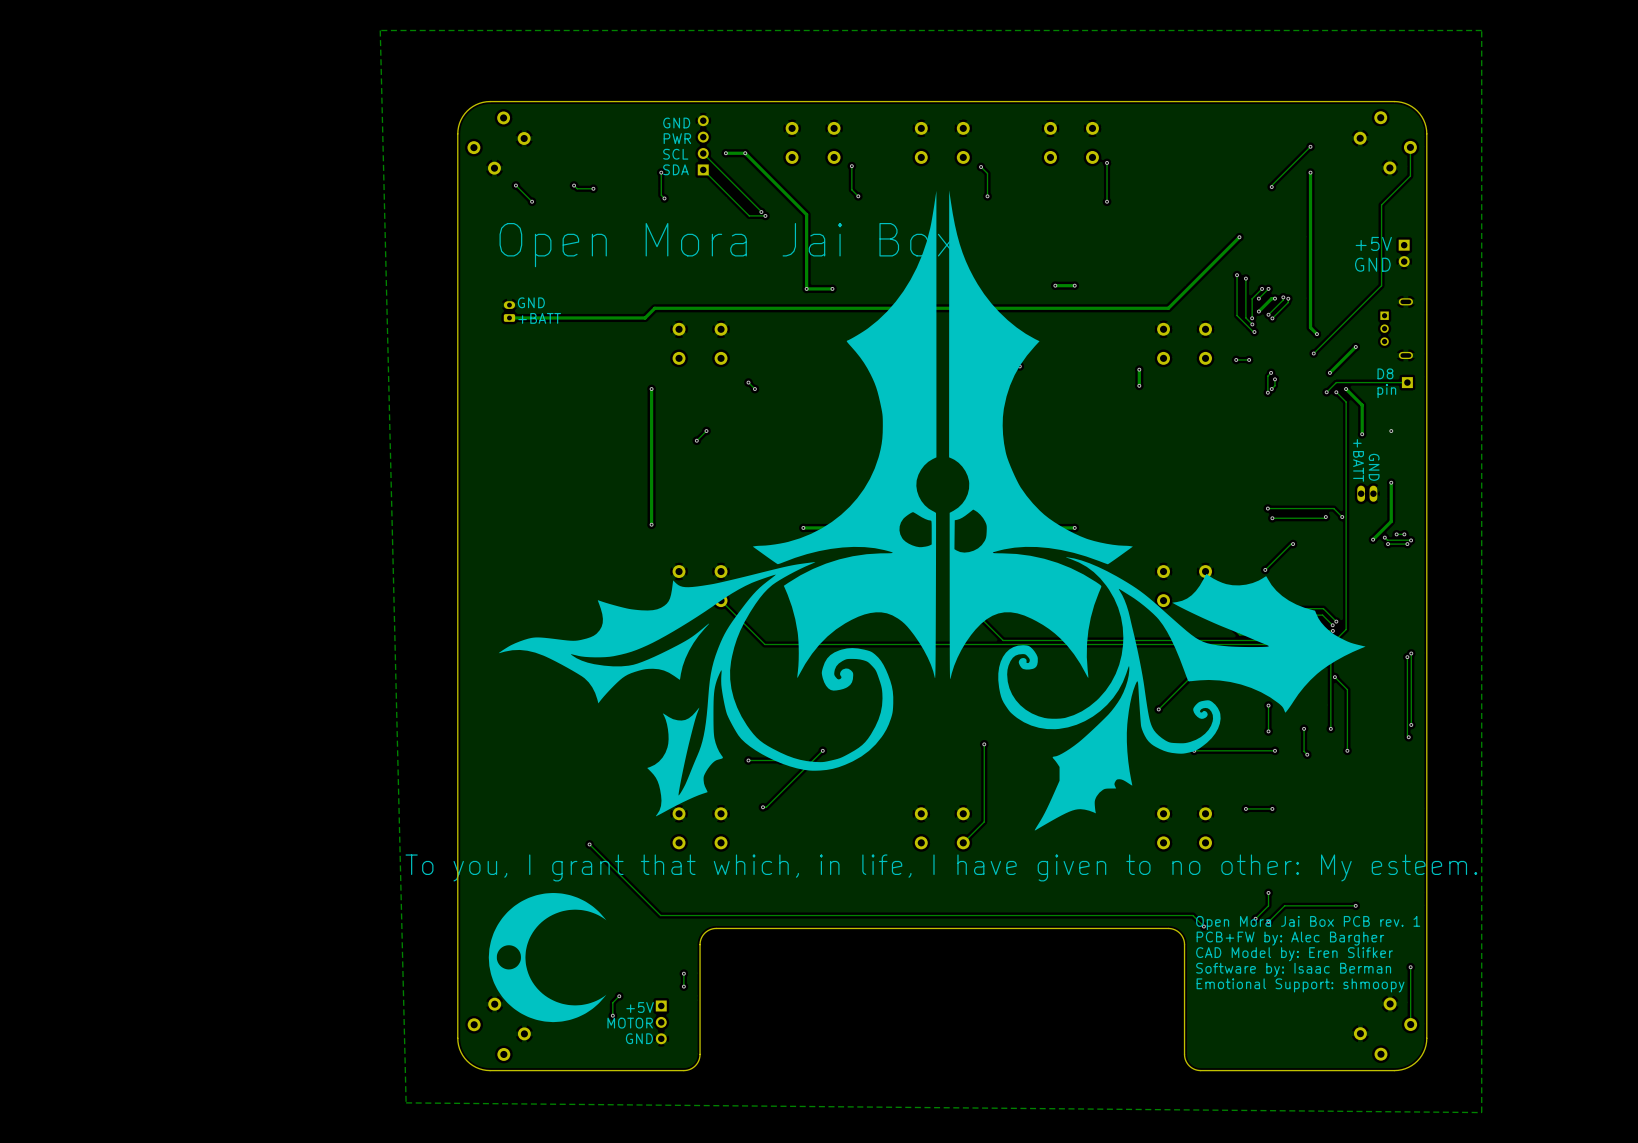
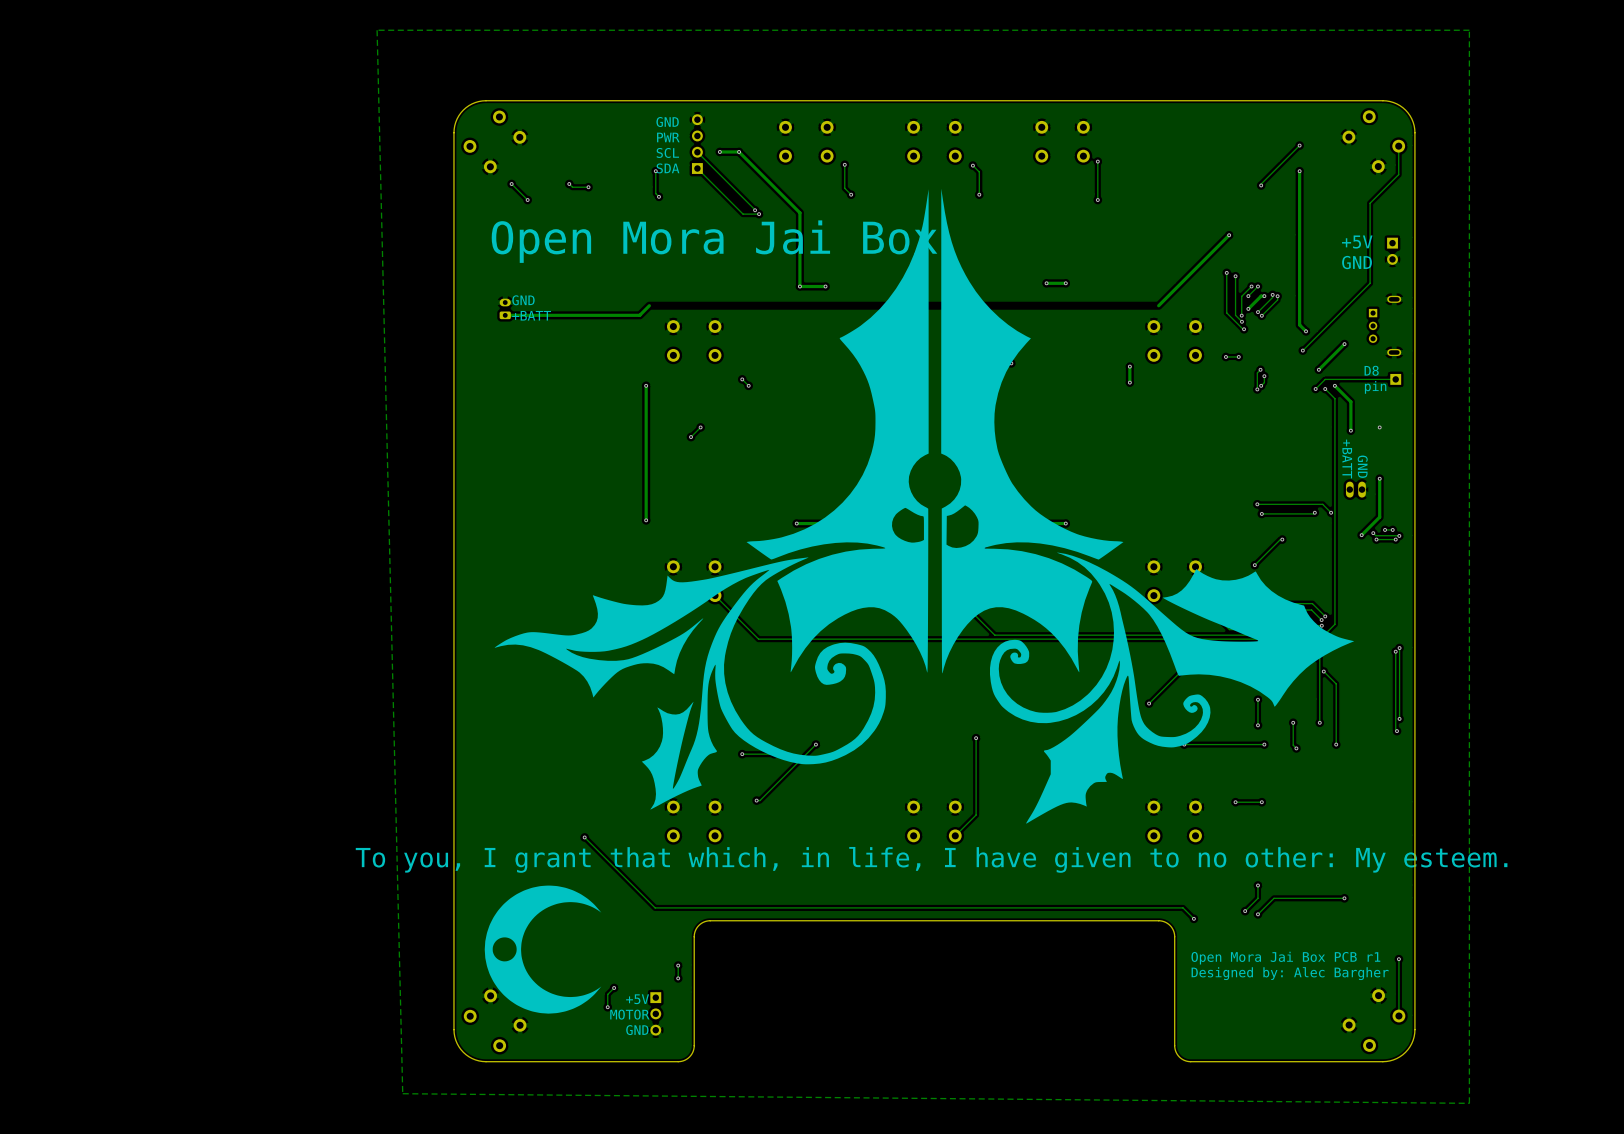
track: (1168, 308) (654, 308) -> none
text: Open Mora Jai Box PCB rev. 1 (1308, 923) -> none
text: PCB+FW by: Alec Bargher (1290, 938) -> none
text: CAD Model by: Eren Slifker (1294, 954) -> none
text: none -> Open Mora Jai Box PCB r1 (1285, 958)
text: Software by: Isaac Berman (1293, 969) -> none
text: none -> Designed by: Alec Bargher (1290, 973)
text: Emotional Support: shmoopy (1300, 985) -> none

